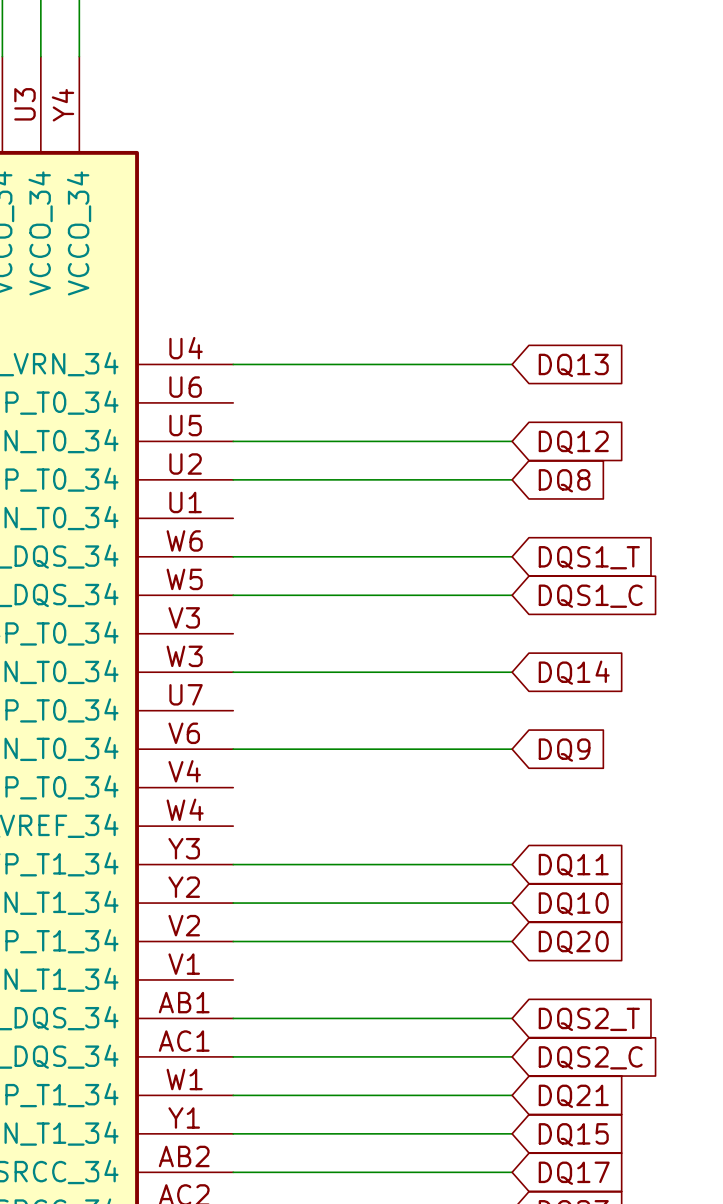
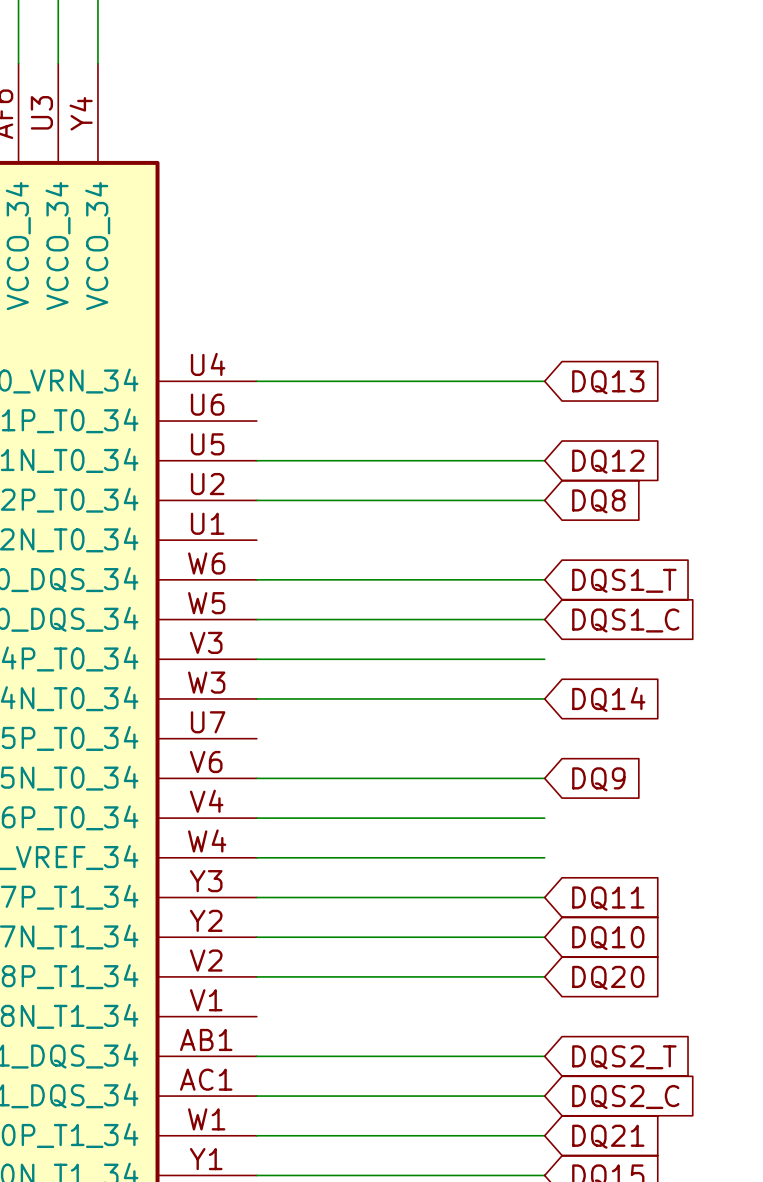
wire: none -> (256, 659) (544, 659)
wire: none -> (256, 818) (544, 818)
wire: none -> (256, 857) (544, 857)

